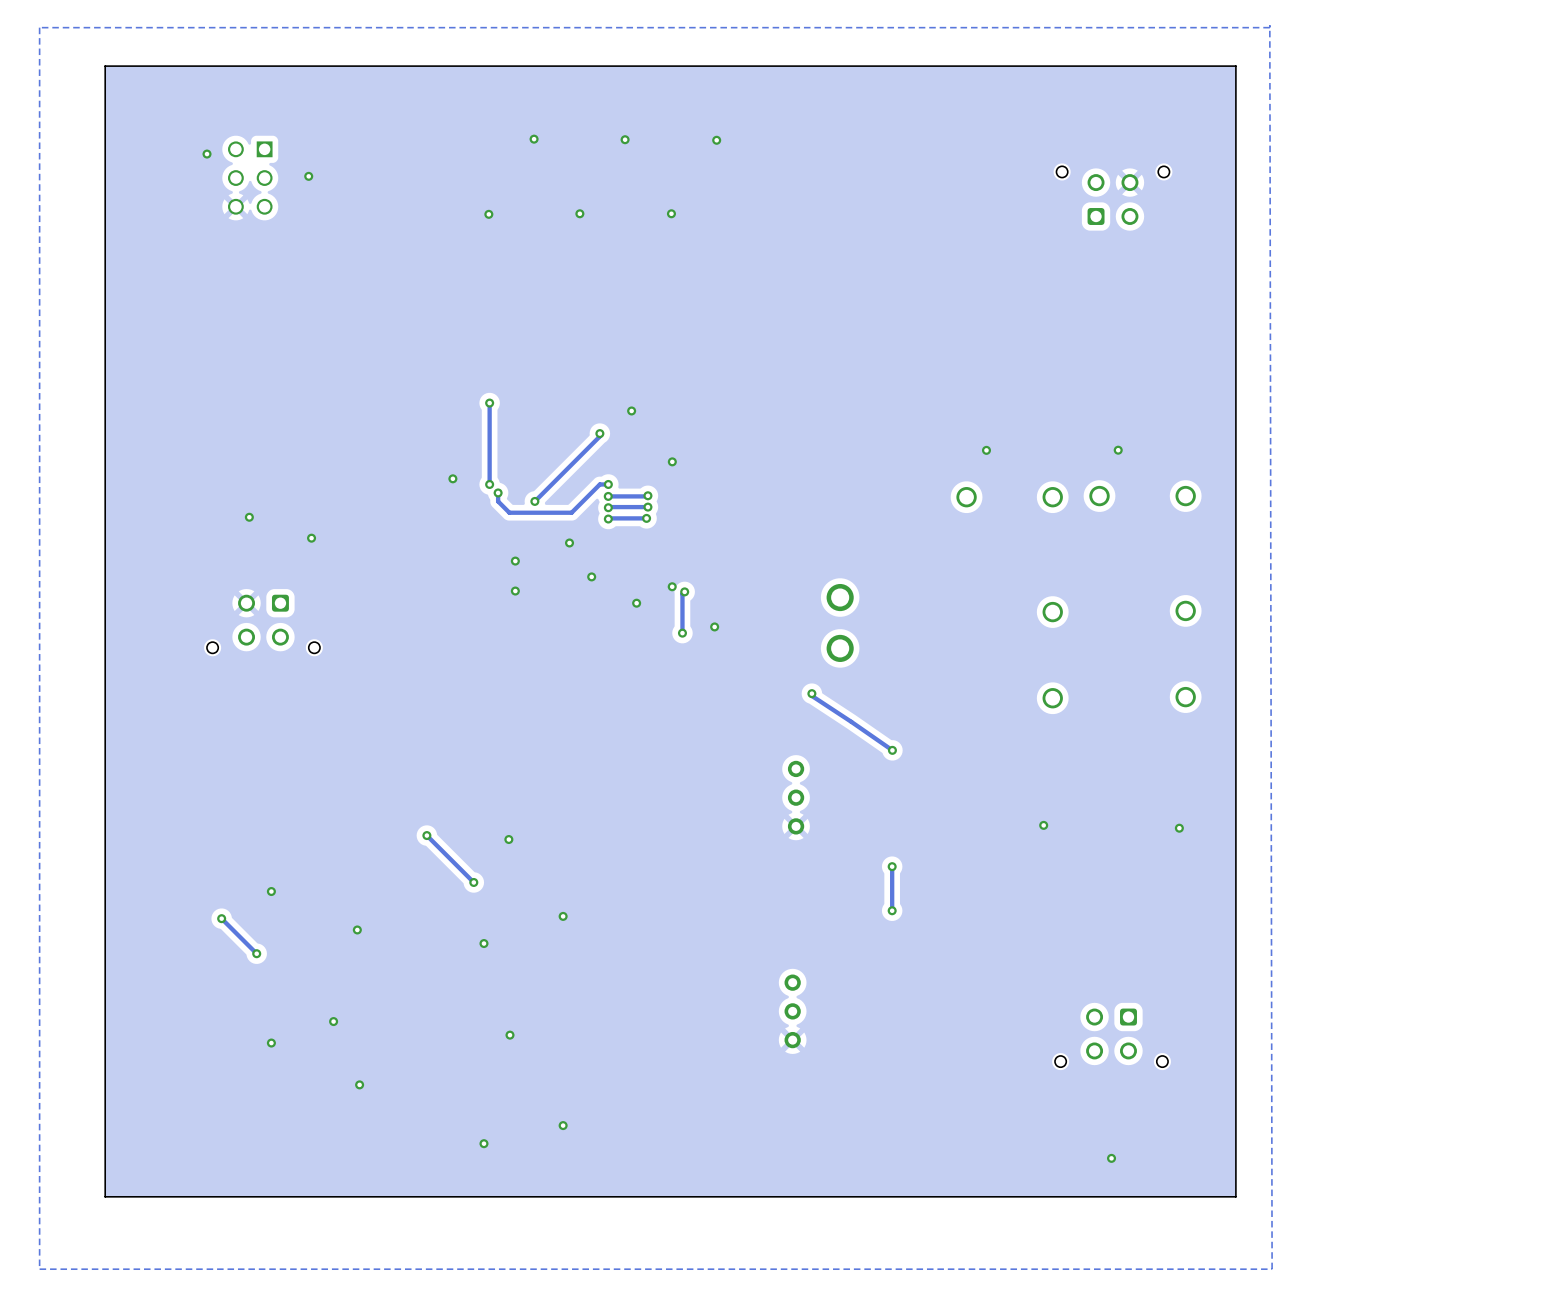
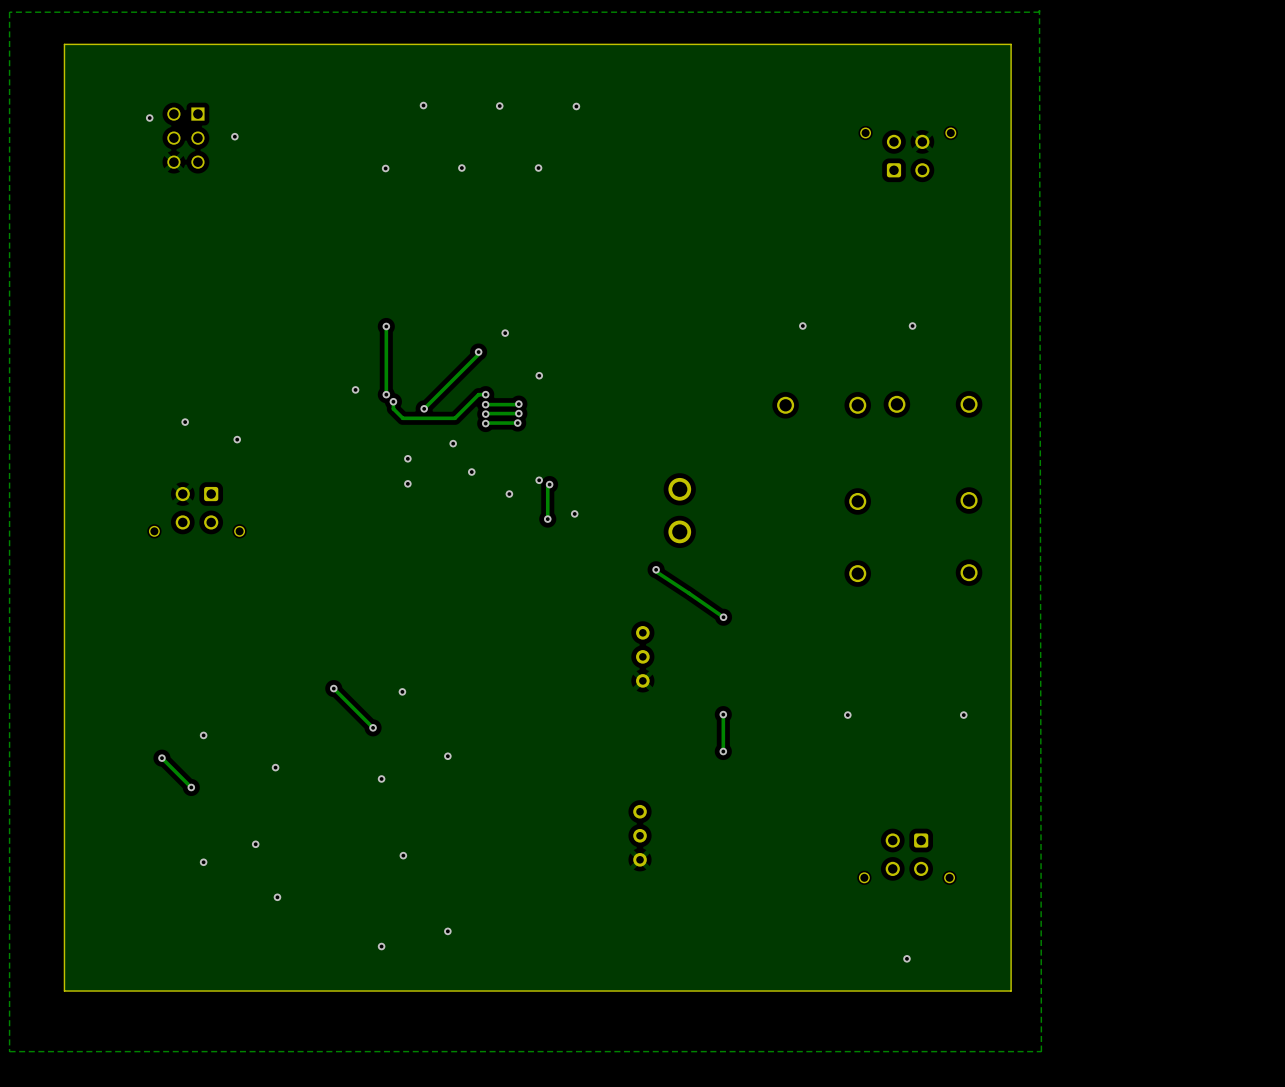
via position: (986, 450) -> (802, 326)
via position: (1118, 450) -> (912, 326)
via position: (1043, 825) -> (847, 715)
via position: (1179, 828) -> (963, 715)

